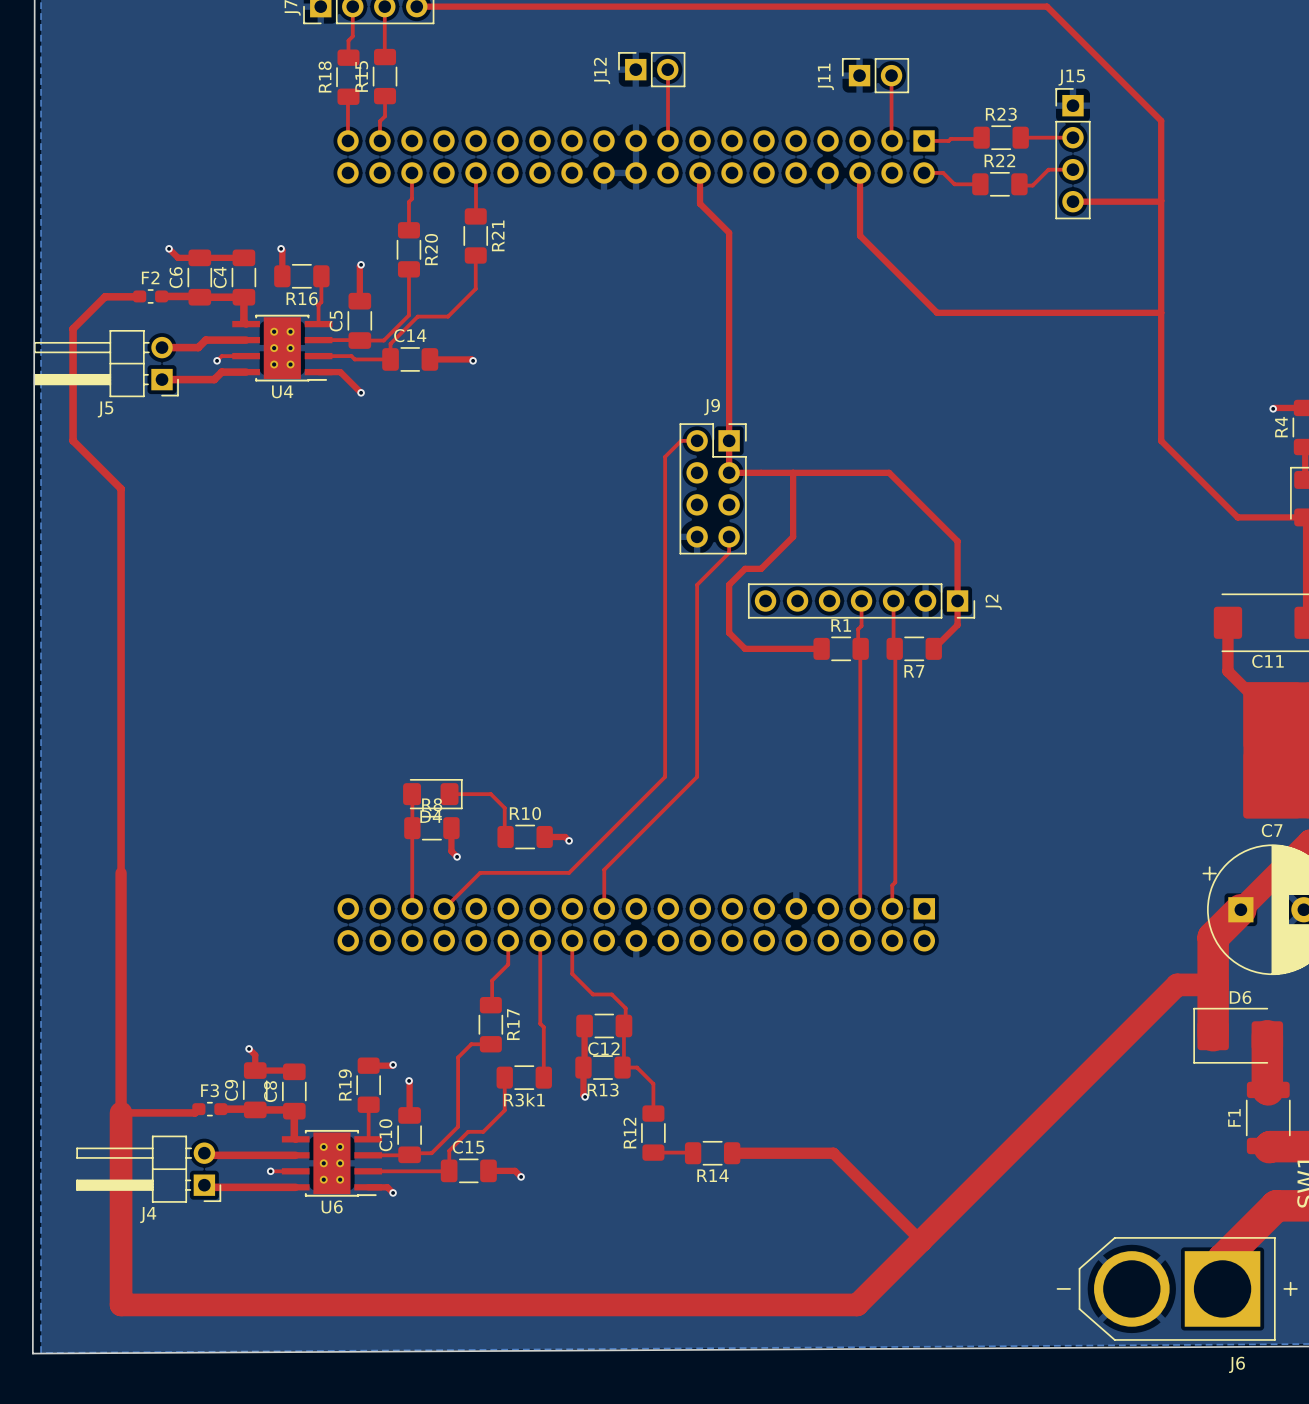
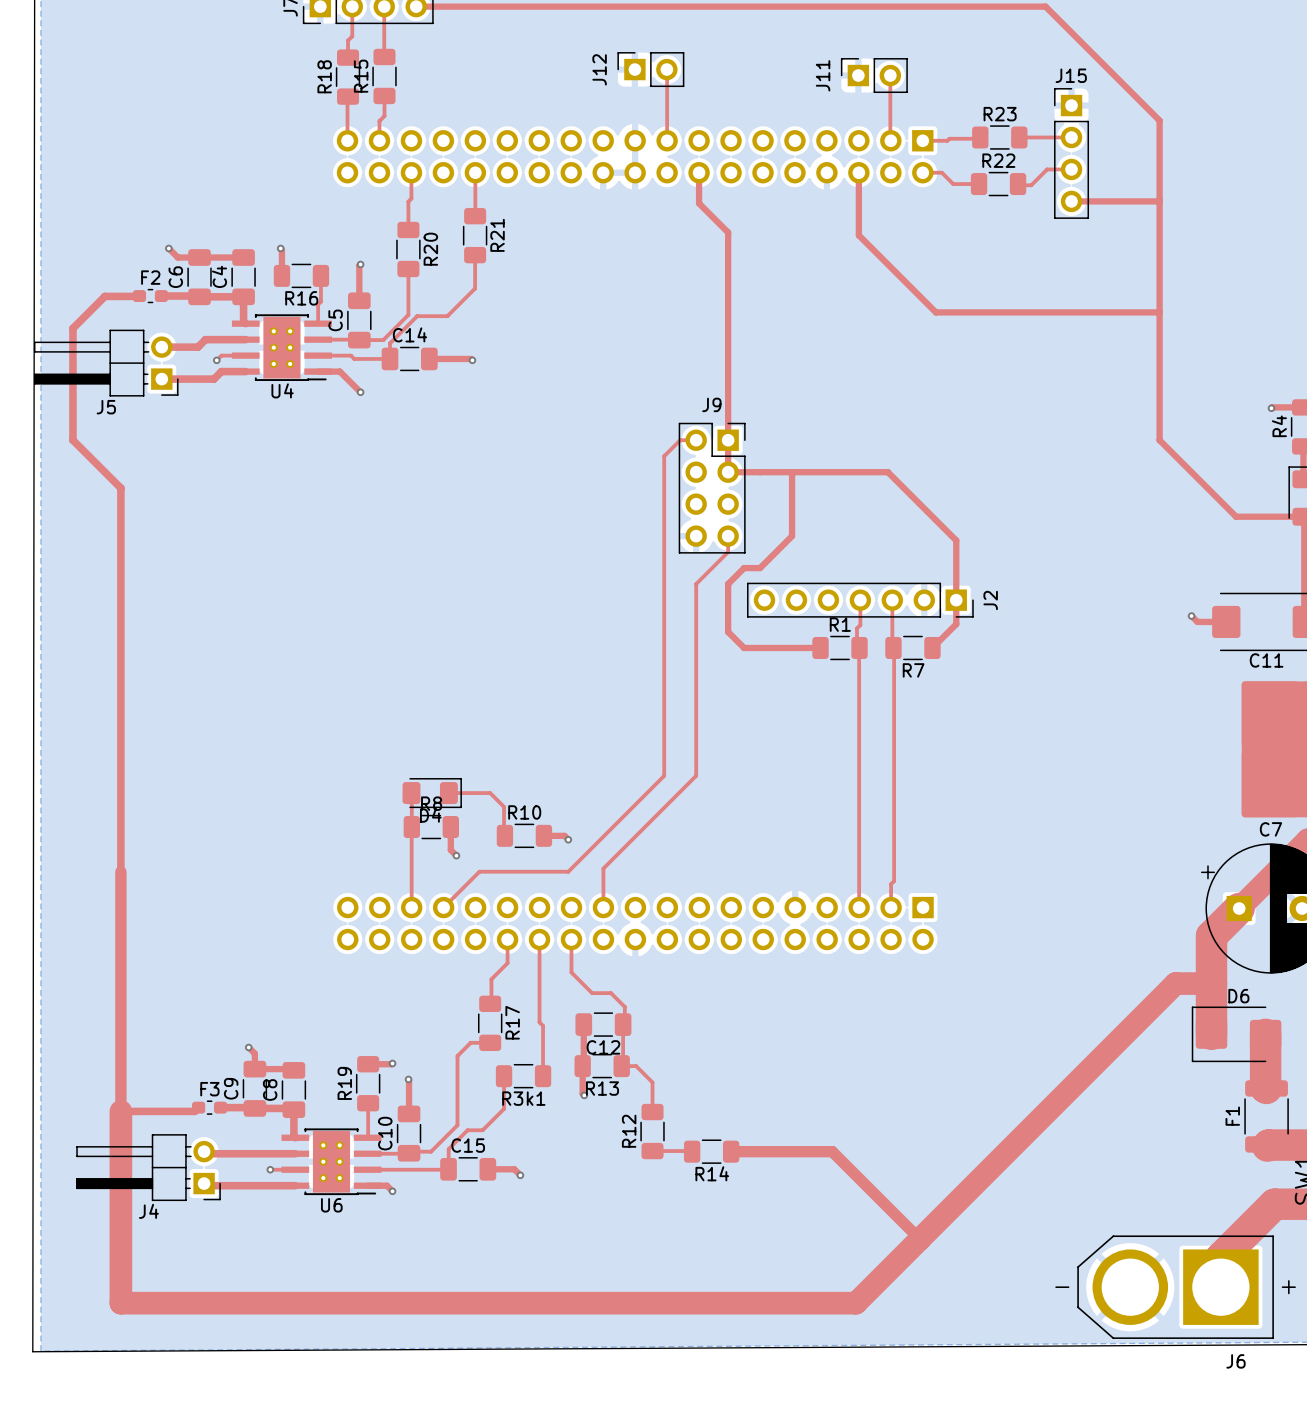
via: none -> (1191, 616)
top track: (1227, 622) (1227, 671) (1272, 715) -> (1226, 621) (1197, 621) (1191, 616)

